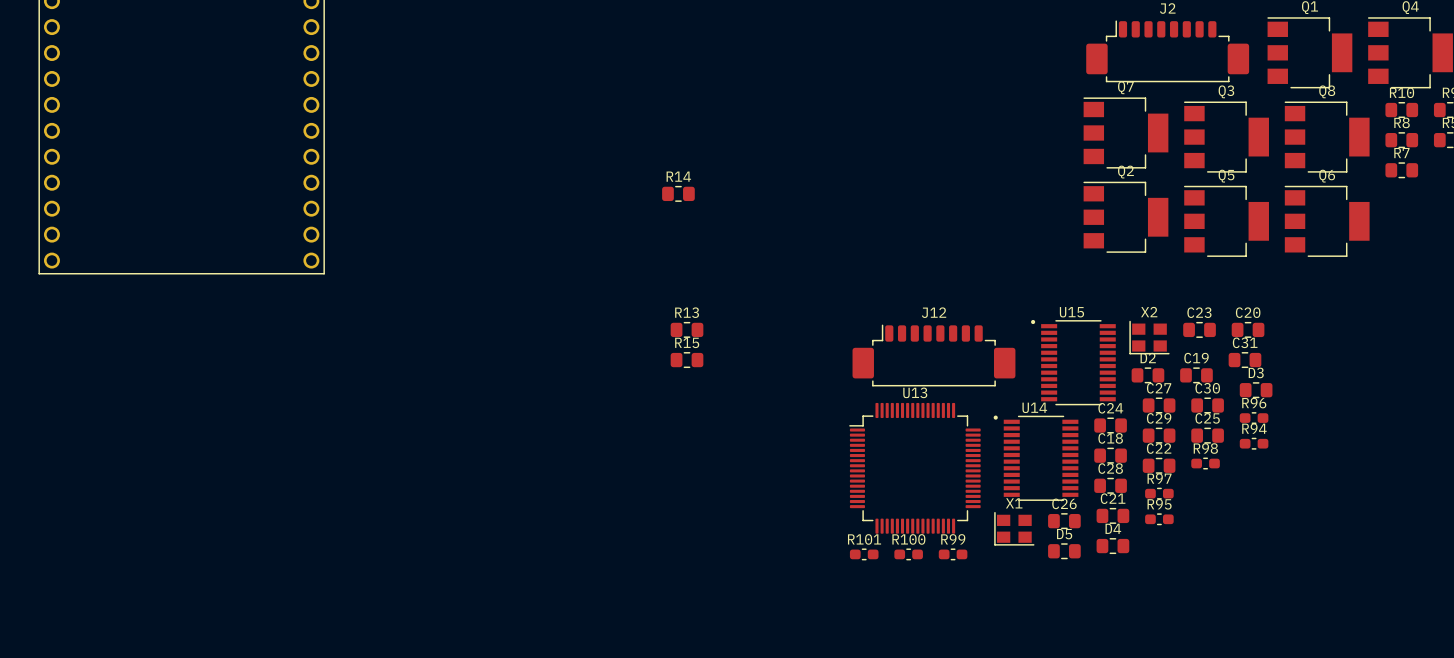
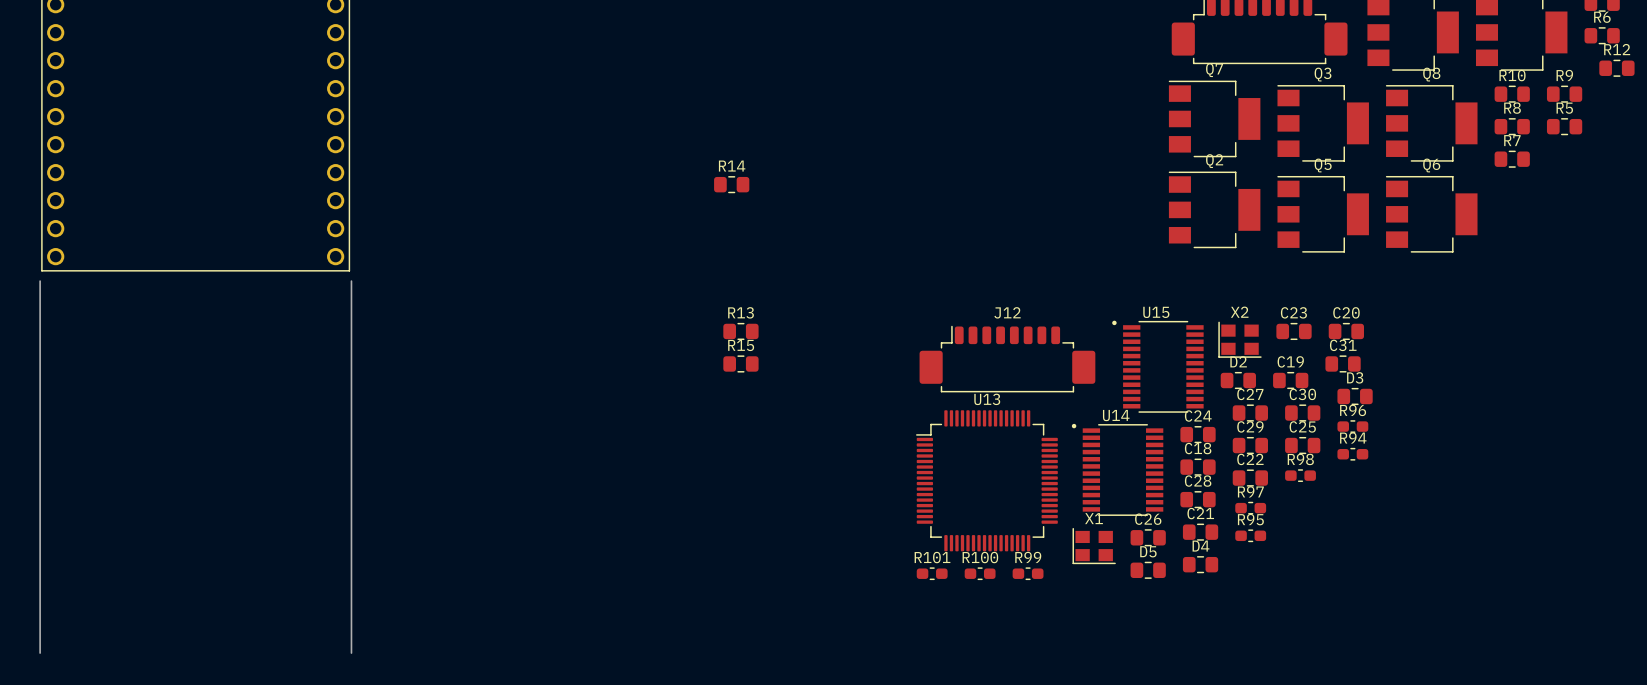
line: none -> (40, 281) (40, 653)
line: none -> (351, 281) (351, 653)

